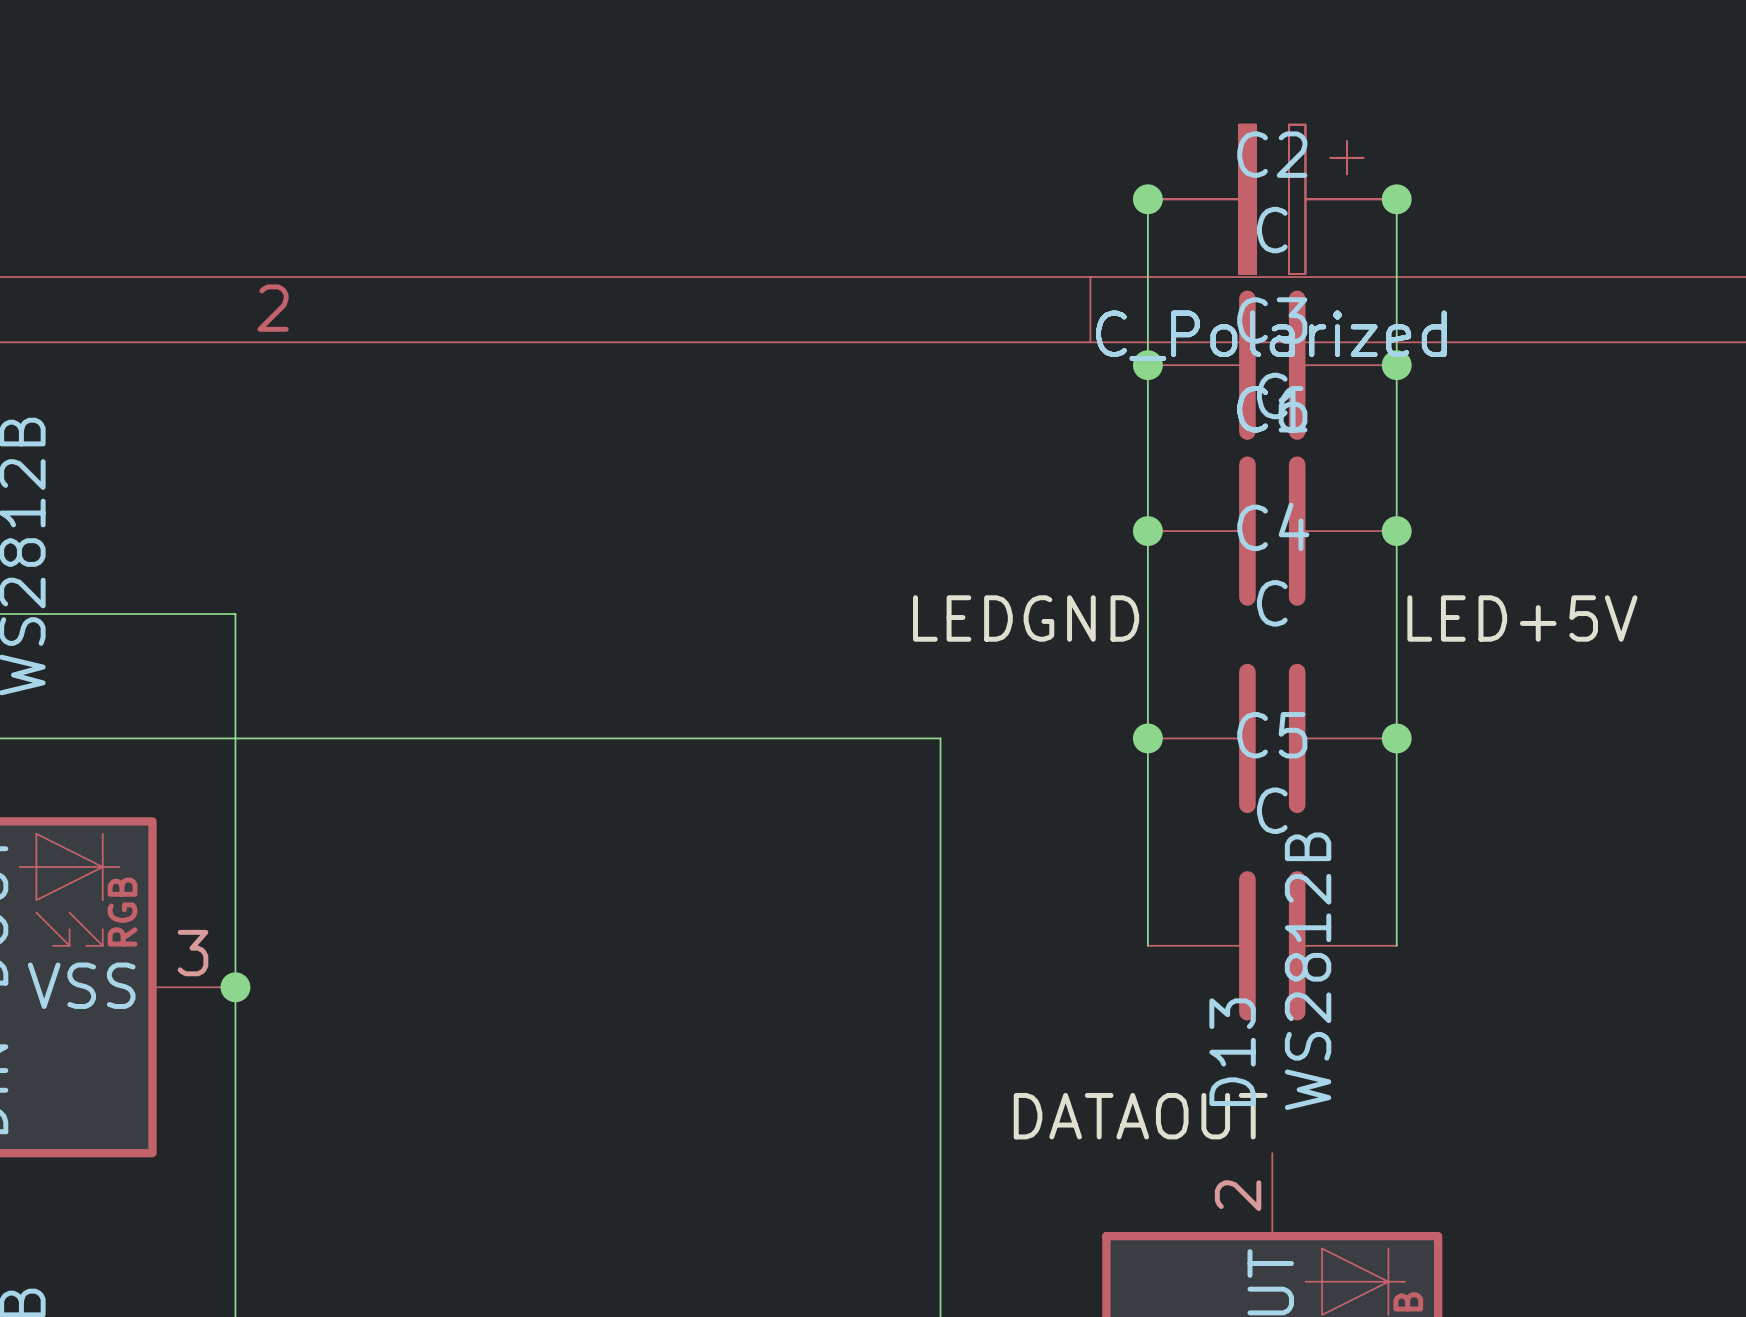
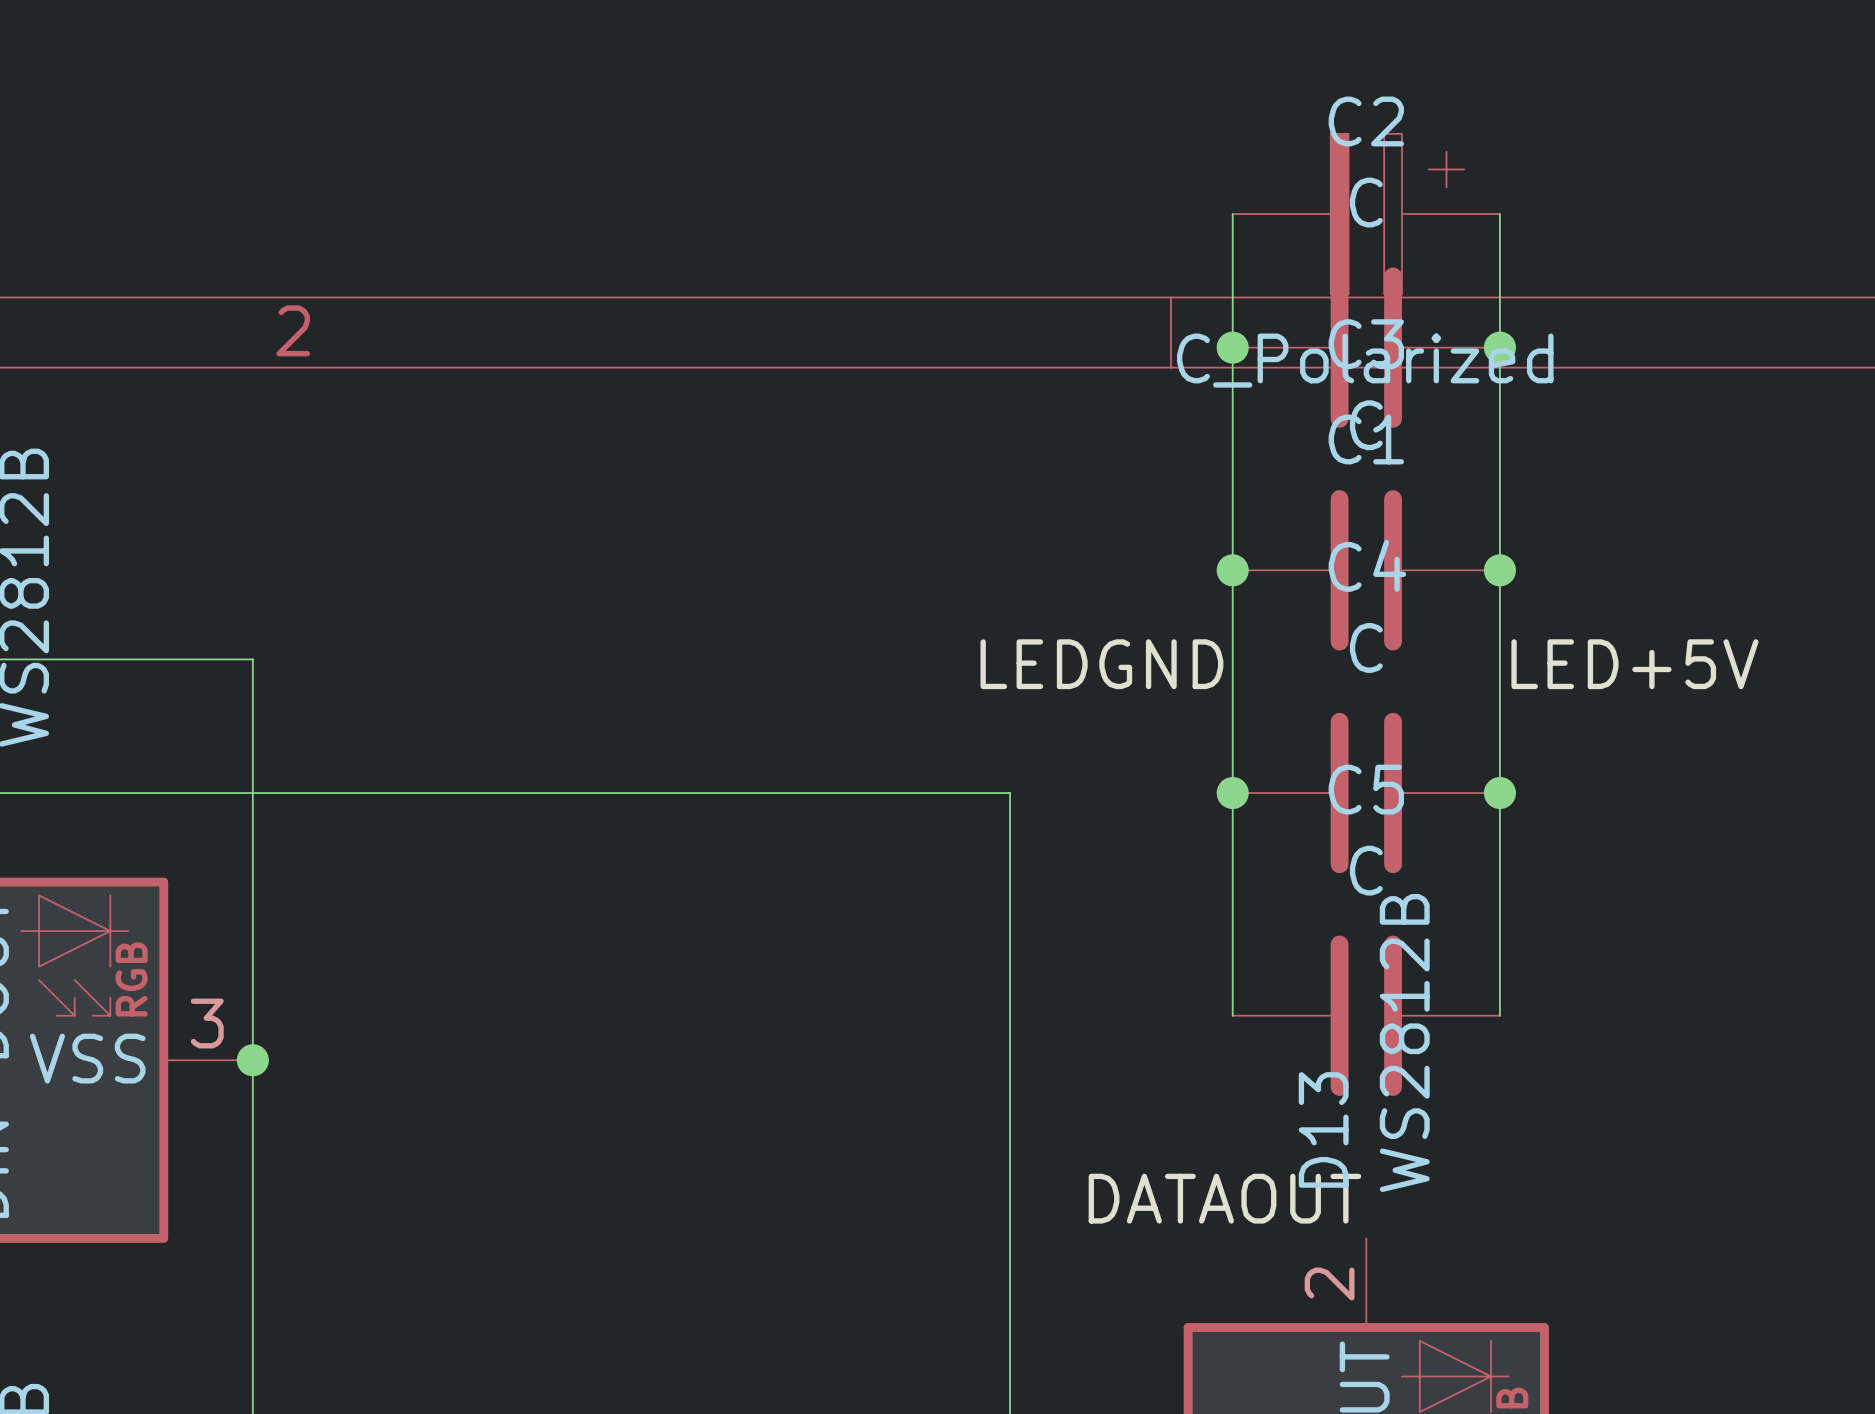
junction: (1147, 199) -> none
part: C_Polarized (1272, 199) -> none
junction: (1396, 199) -> none
junction position: (1147, 365) -> (1232, 347)
C2 position: (1272, 365) -> (1366, 347)
junction position: (1396, 365) -> (1499, 347)

